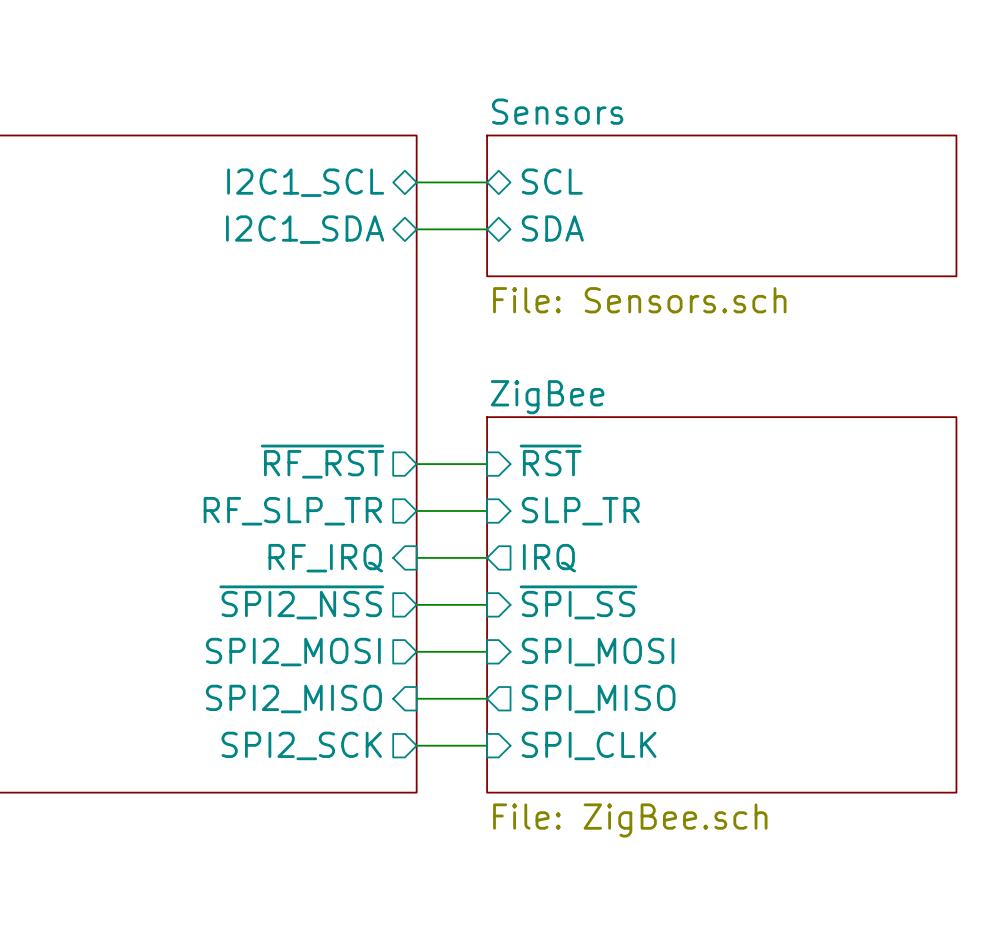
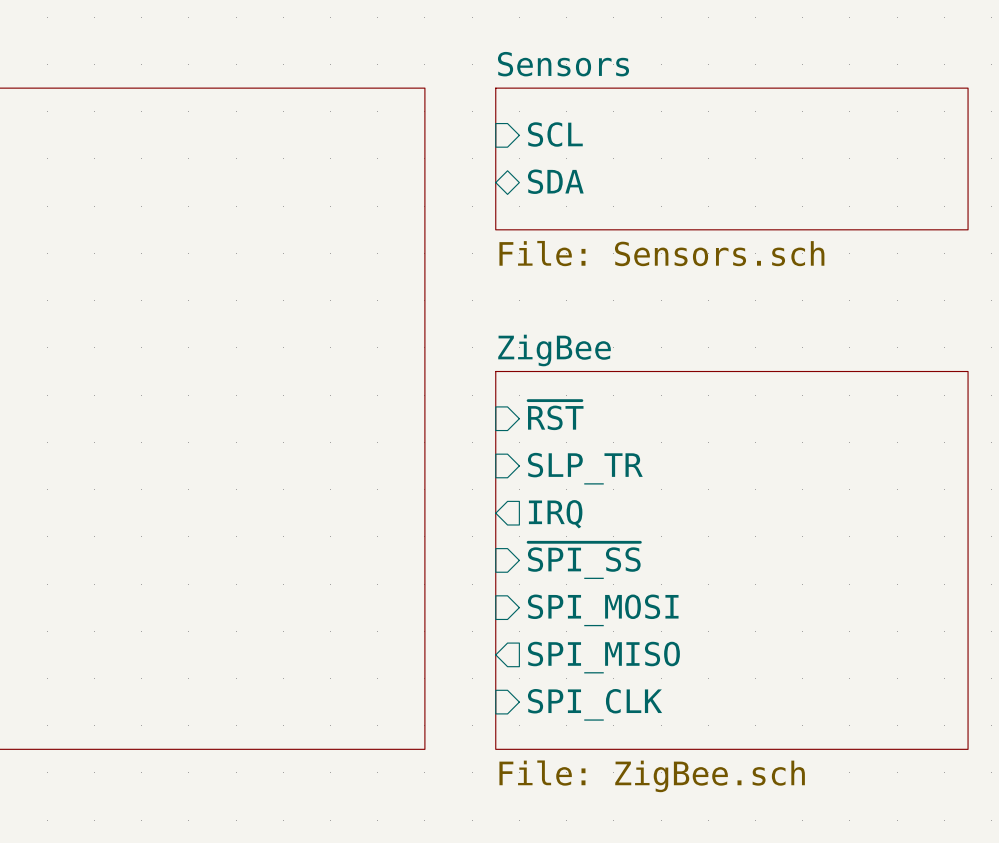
sheet pin shape: bidirectional (552, 181) -> input (555, 134)
sheet pin: I2C1_SCL (305, 182) -> none
wire: (416, 182) (487, 182) -> none
sheet pin: I2C1_SDA (305, 229) -> none
wire: (416, 229) (487, 229) -> none
sheet pin: ~{RF_RST} (322, 461) -> none
wire: (416, 464) (487, 464) -> none
sheet pin: RF_SLP_TR (292, 511) -> none
wire: (416, 511) (487, 511) -> none
wire: (416, 557) (487, 557) -> none
sheet pin: RF_IRQ (325, 558) -> none
sheet pin: ~{SPI2_NSS} (301, 602) -> none
wire: (416, 604) (487, 604) -> none
wire: (416, 651) (487, 651) -> none
sheet pin: SPI2_MOSI (293, 652) -> none
sheet pin: SPI2_MISO (293, 698) -> none
wire: (416, 698) (487, 698) -> none
sheet pin: SPI2_SCK (301, 745) -> none
wire: (416, 745) (487, 745) -> none

